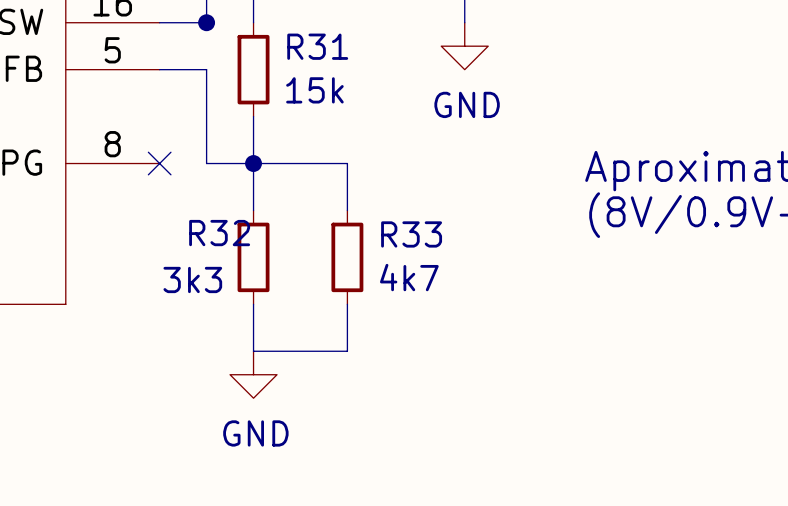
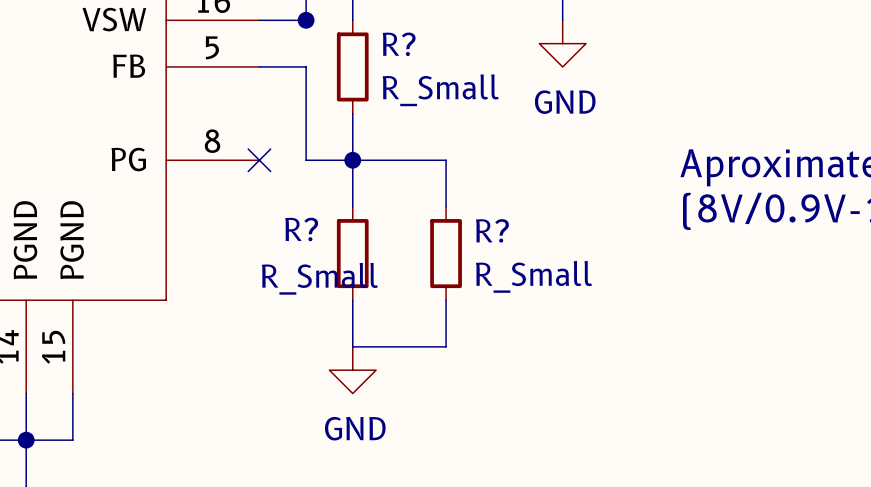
R31 name: R31 (317, 46) -> R? (399, 44)
R31 value: 15k (314, 90) -> R_Small (440, 90)
R32 name: R32 (219, 233) -> R? (301, 229)
R33 name: R33 (411, 234) -> R? (492, 230)
R33 value: 4k7 (409, 277) -> R_Small (534, 276)
R32 value: 3k3 (192, 279) -> R_Small (319, 278)

